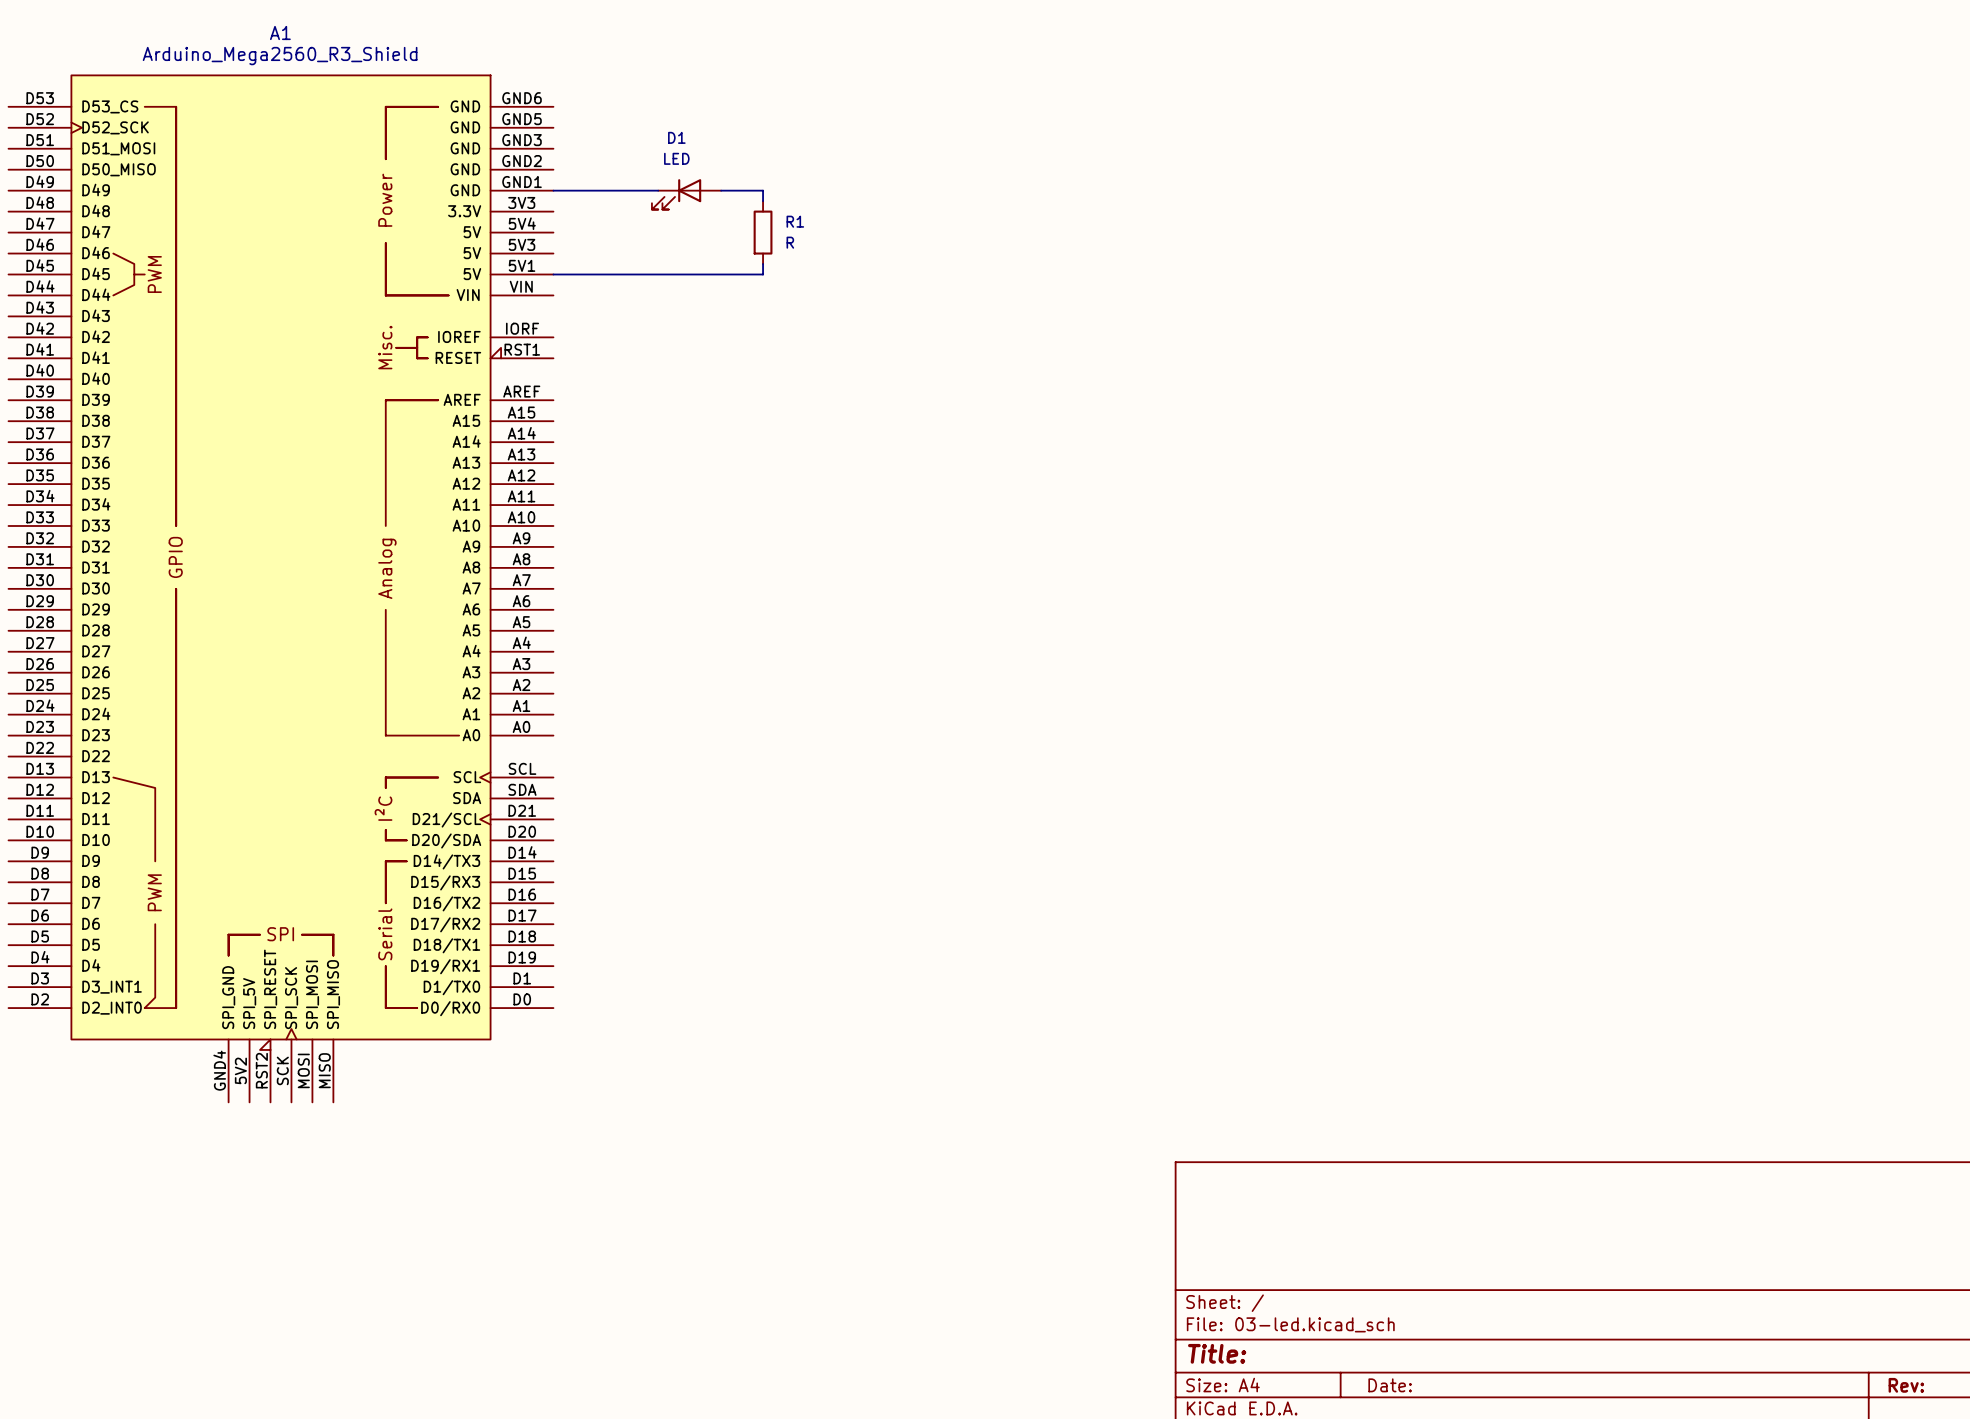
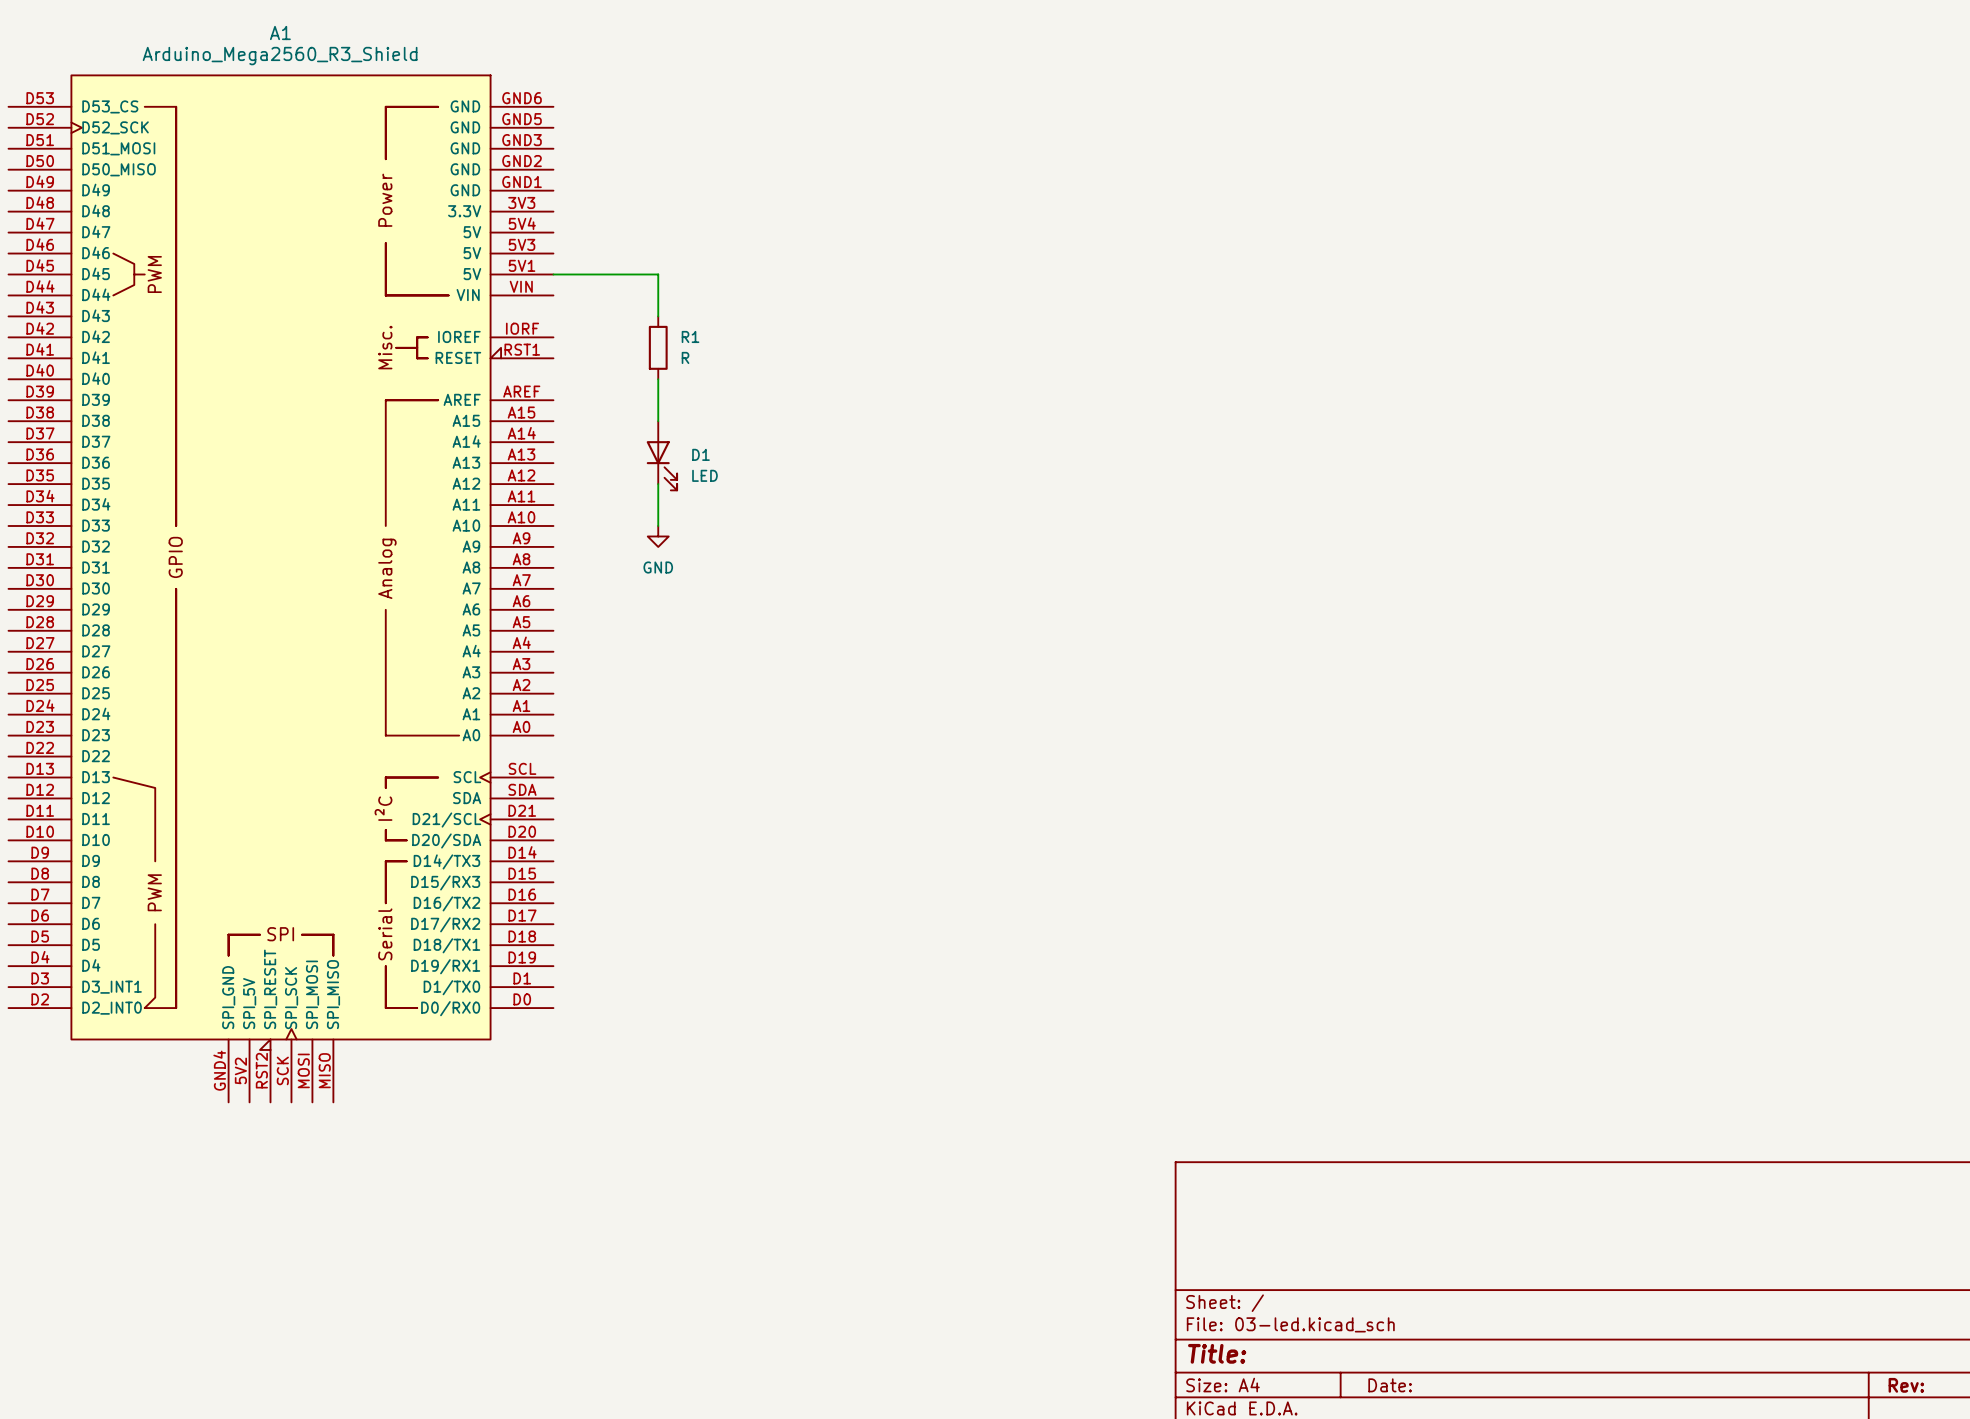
D1 name position: D1 (676, 137) -> D1 (700, 454)
D1 value position: LED (676, 158) -> LED (704, 475)
wire: (553, 190) (658, 190) -> none
wire: (721, 190) (763, 190) (763, 201) -> none
D1 rotation: 0° (676, 194) -> 90° counterclockwise (661, 465)
D1 position: (686, 194) -> (661, 455)
R1 position: (763, 232) -> (658, 347)
wire: (763, 264) (763, 274) (658, 274) -> (658, 316) (658, 274)
wire: none -> (658, 379) (658, 421)
wire: none -> (658, 484) (658, 525)
power symbol: none -> GND (658, 536)

